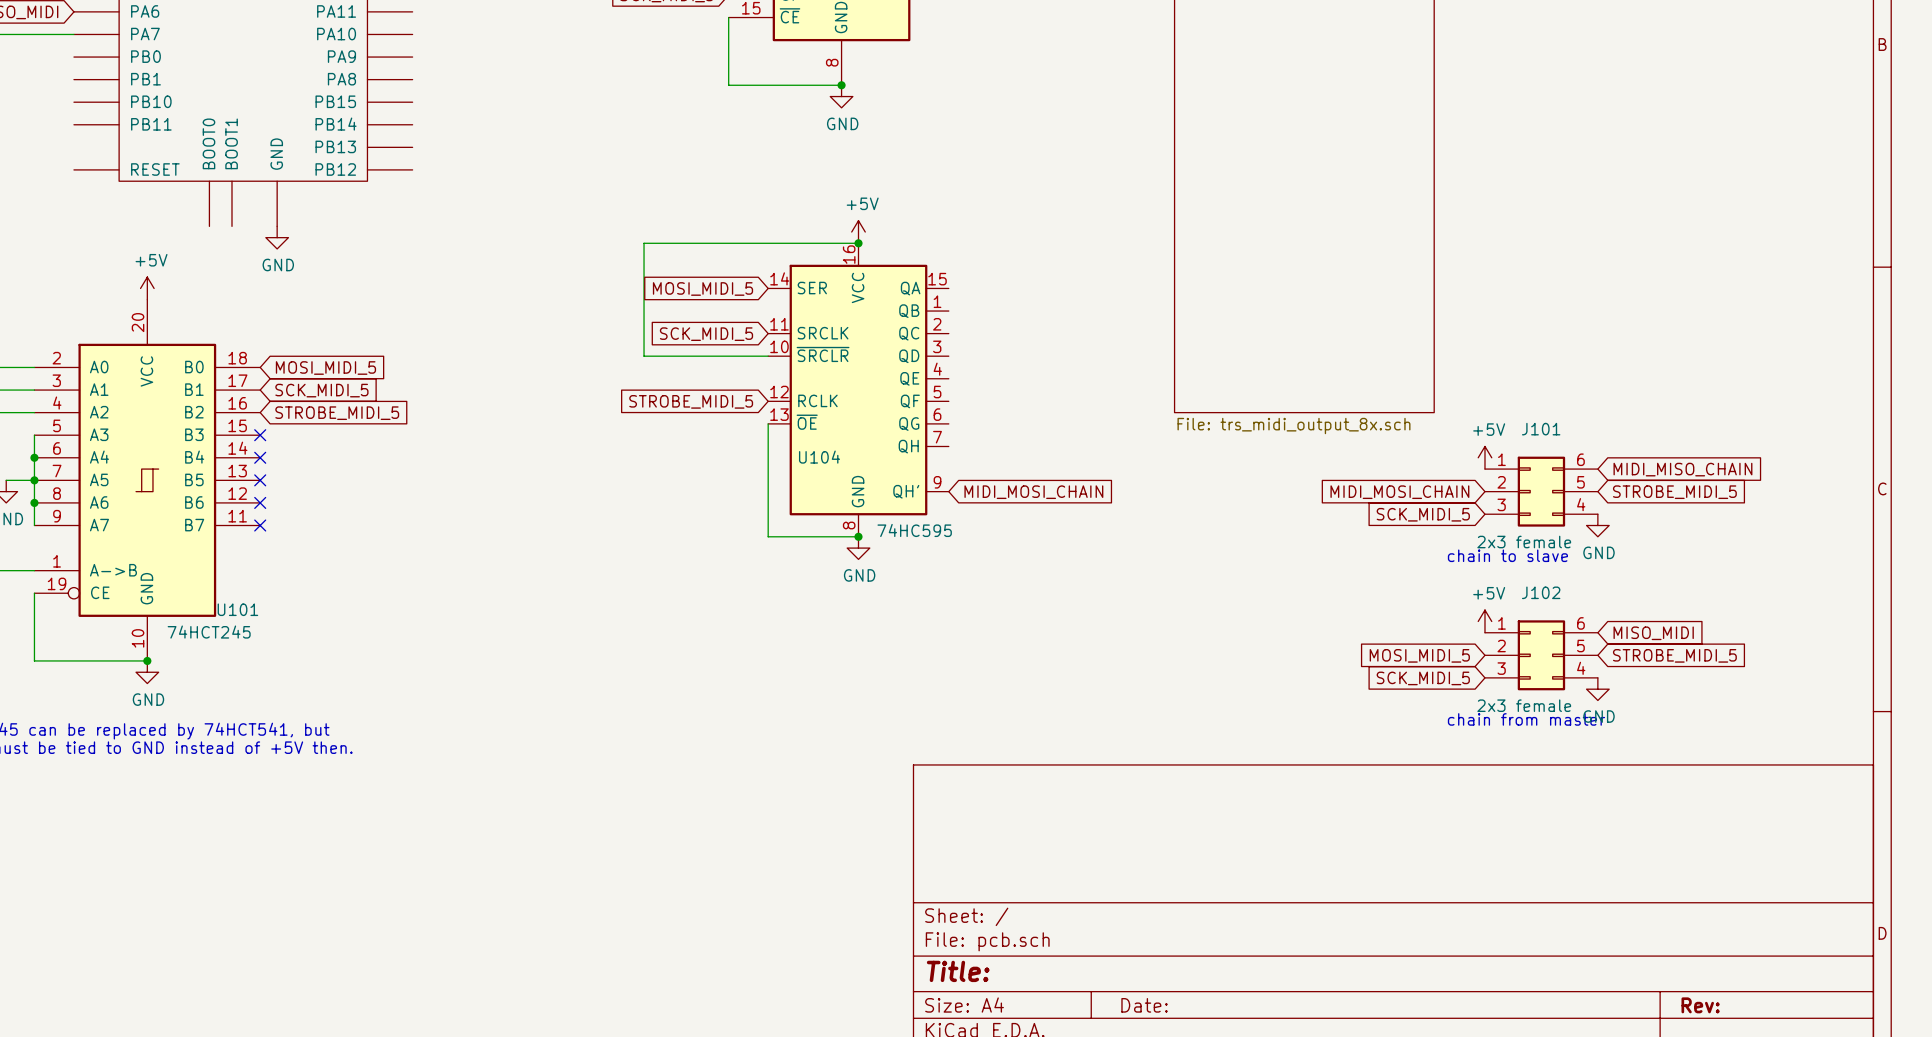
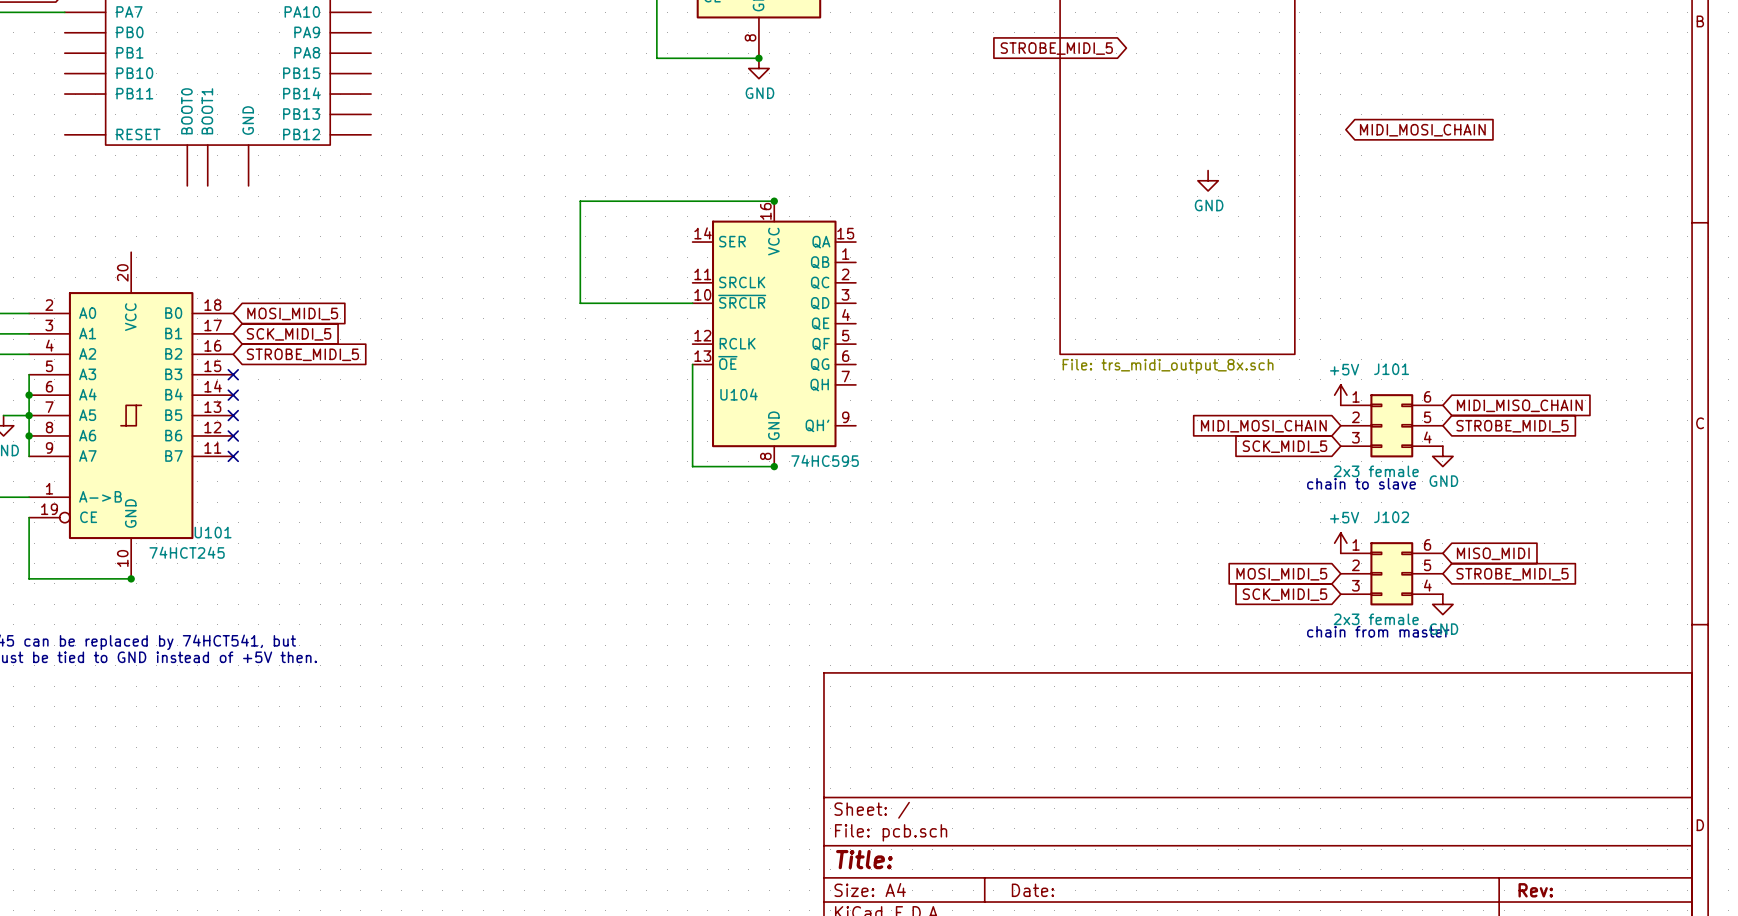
global label: none -> STROBE_MIDI_5 (1056, 48)
global label: none -> MIDI_MOSI_CHAIN (1422, 130)
power symbol: none -> GND (1208, 180)
power symbol: +5V (858, 232) -> none
power symbol: GND (277, 237) -> none
power symbol: +5V (147, 288) -> none
global label: MOSI_MIDI_5 (702, 288) -> none
global label: SCK_MIDI_5 (706, 334) -> none
global label: STROBE_MIDI_5 (691, 401) -> none
global label: MIDI_MOSI_CHAIN (1033, 492) -> none
power symbol: GND (858, 548) -> none
power symbol: GND (147, 672) -> none

